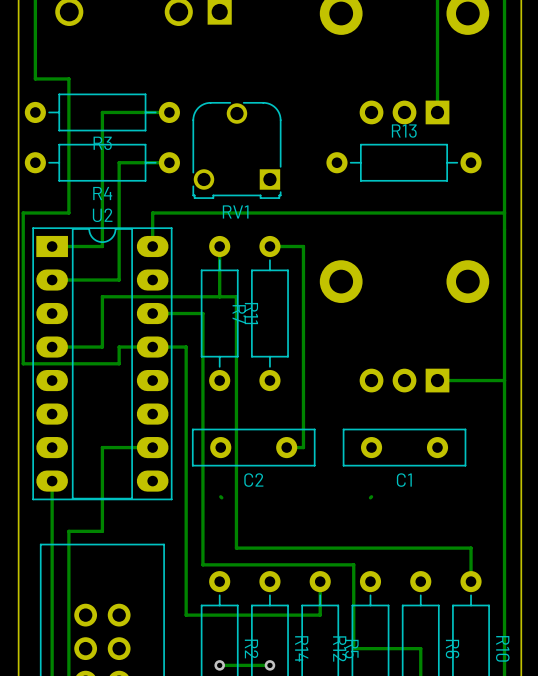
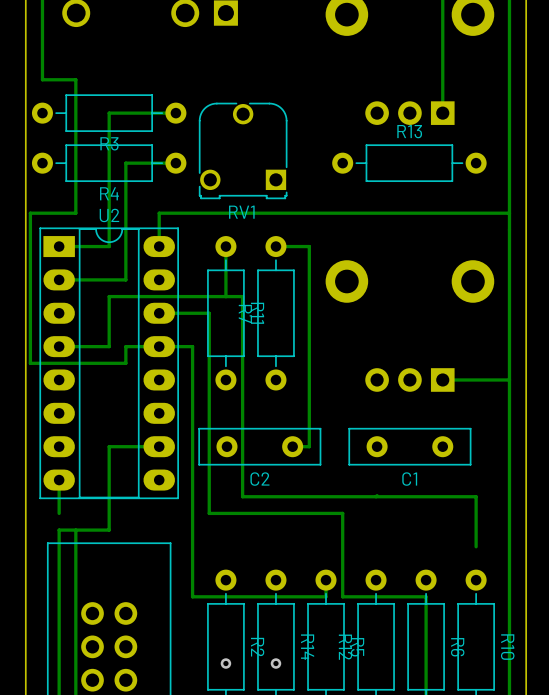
track: (220, 496) (221, 497) -> none
track: (236, 497) (236, 548) (471, 548) (471, 581) -> (242, 496) (476, 496) (476, 546)
track: (52, 514) (52, 531) -> (75, 530) (59, 530)
track: (202, 514) (202, 564) (353, 564) (353, 648) (420, 648) -> (209, 513) (342, 513) (342, 596) (426, 596) (426, 646)
track: (320, 598) (320, 615) (186, 615) (186, 598) -> (326, 596) (192, 596)
track: (269, 665) (219, 665) -> none

